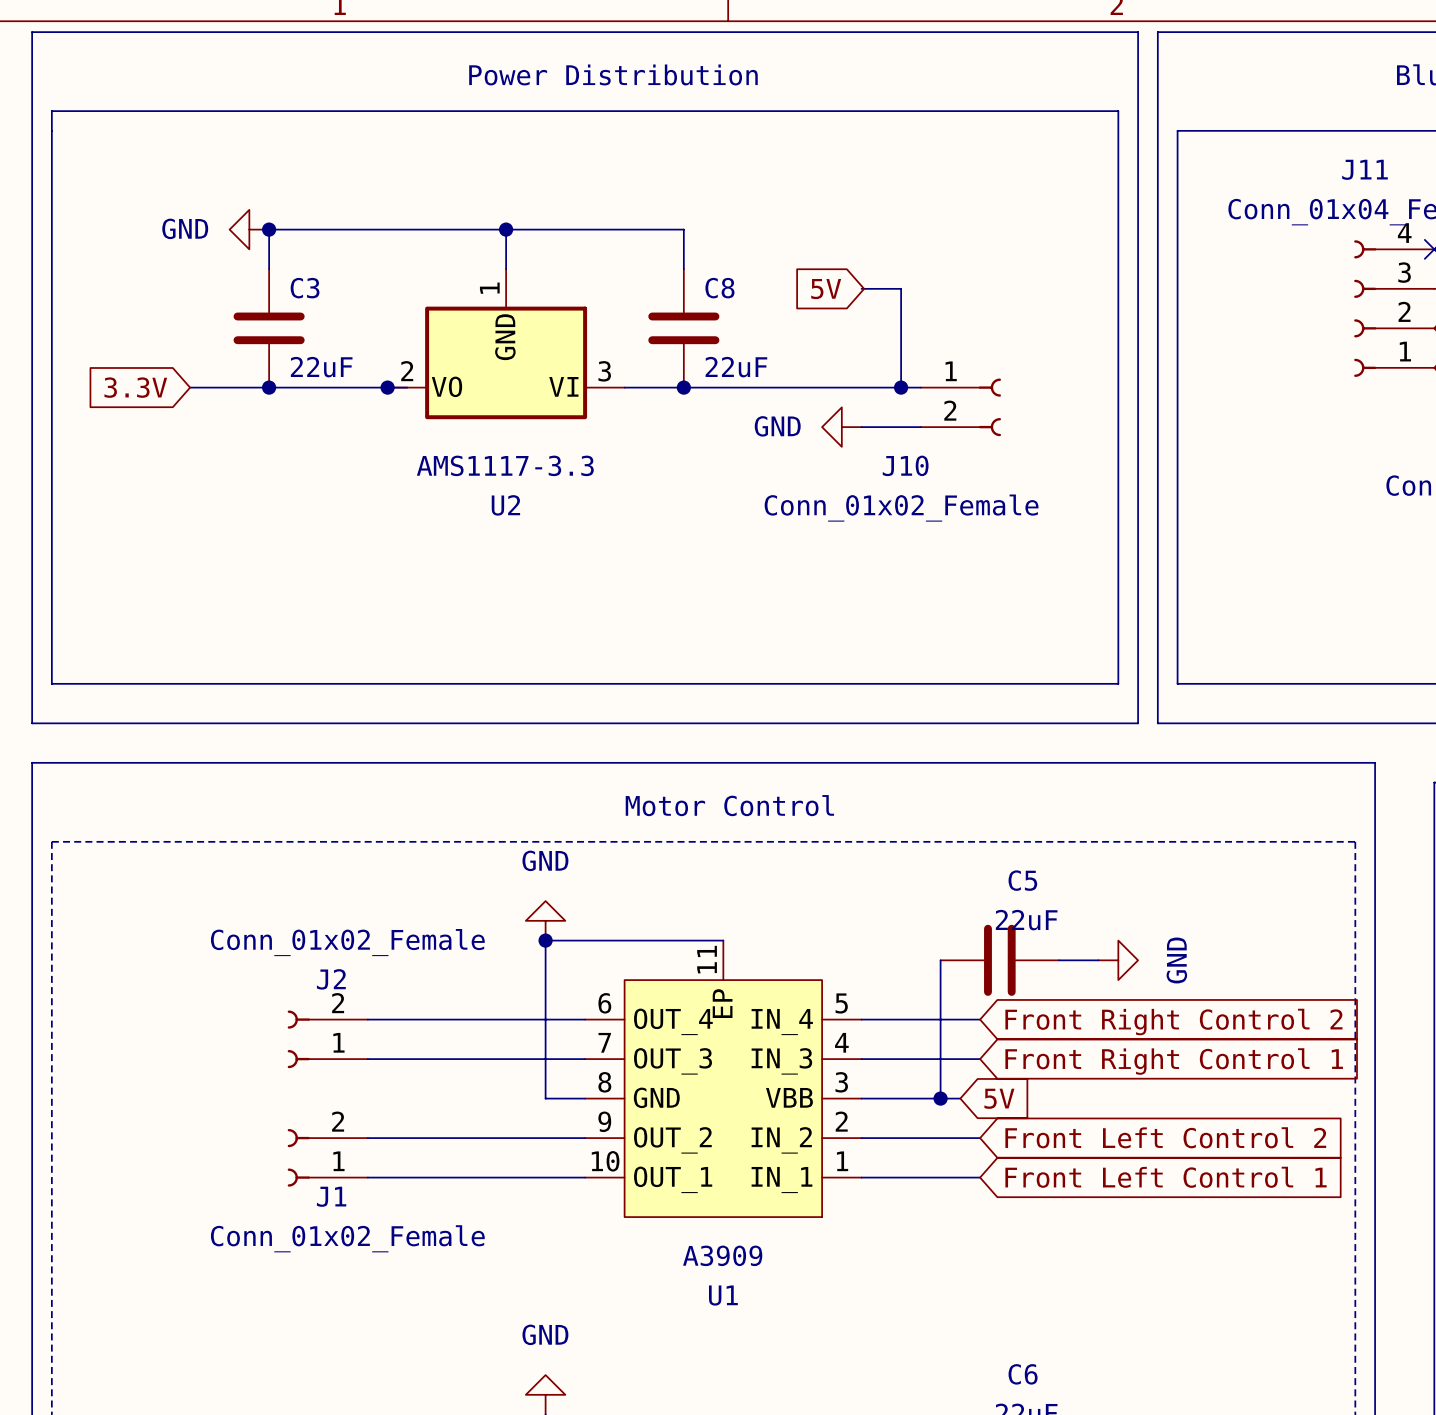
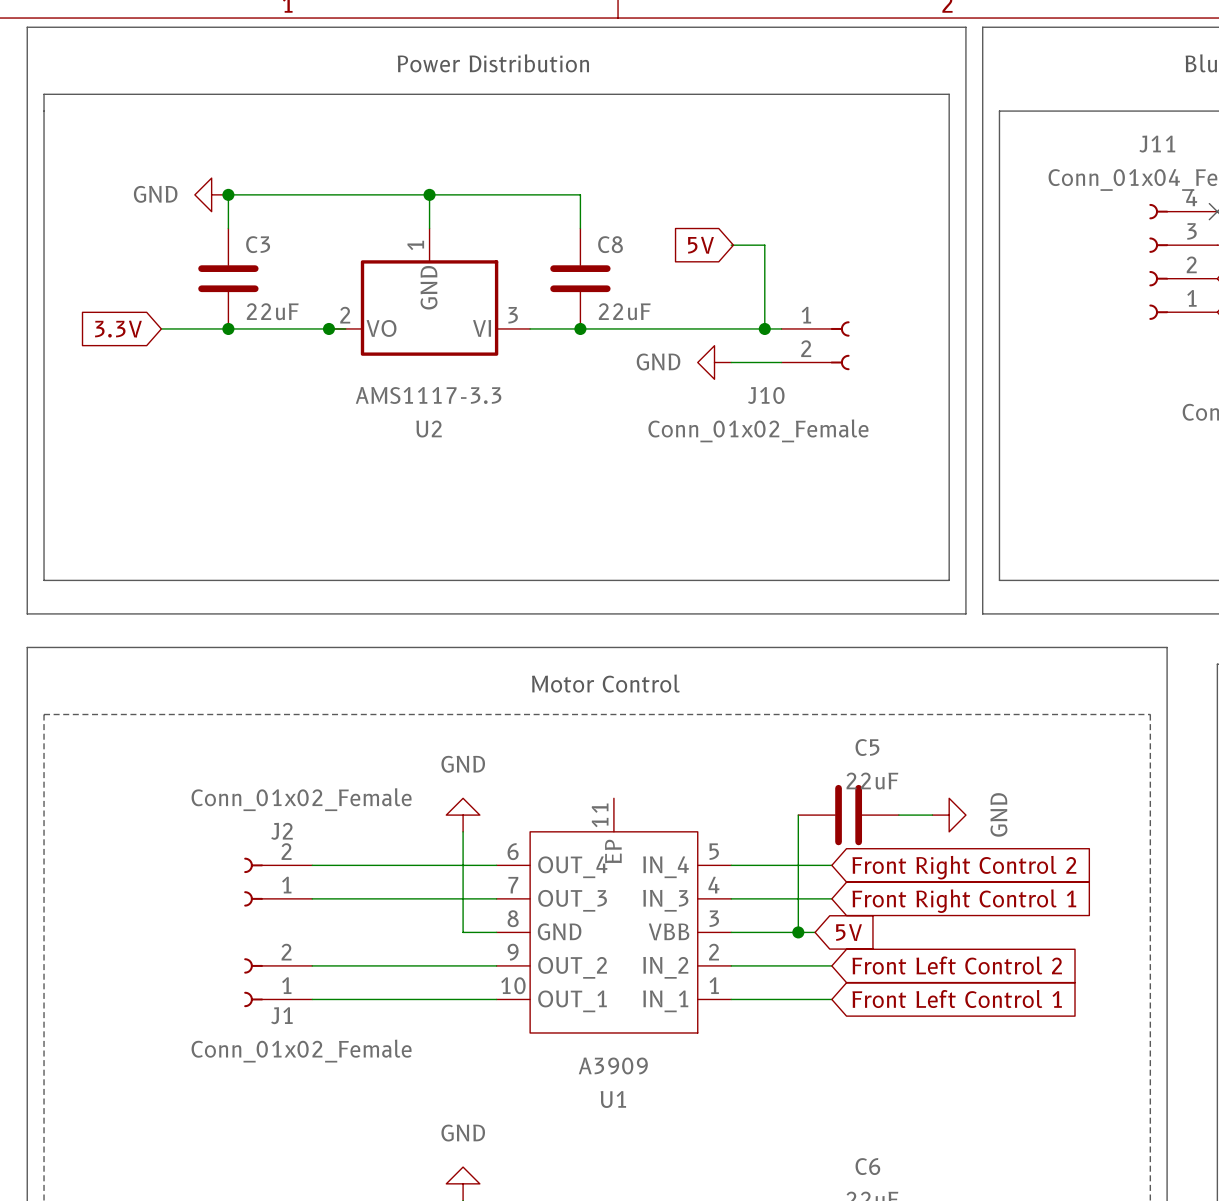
power symbol position: GND (545, 920) -> GND (463, 815)
junction: (545, 940) -> none
wire: (723, 940) (545, 940) (545, 980) -> none

